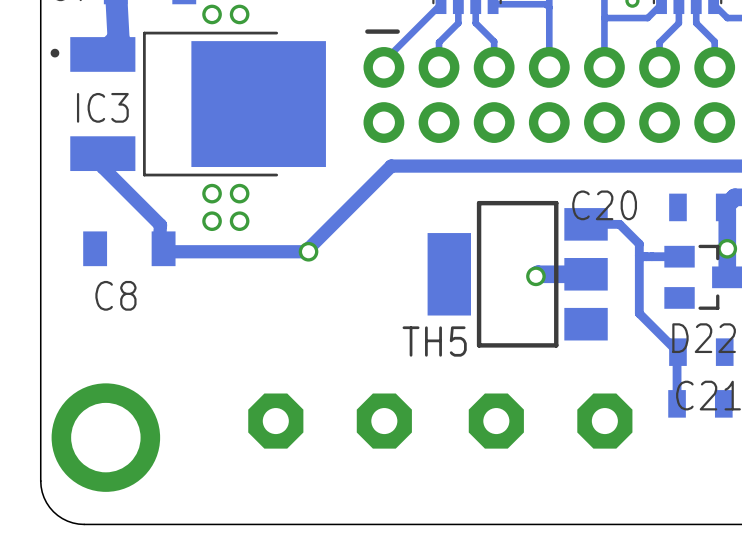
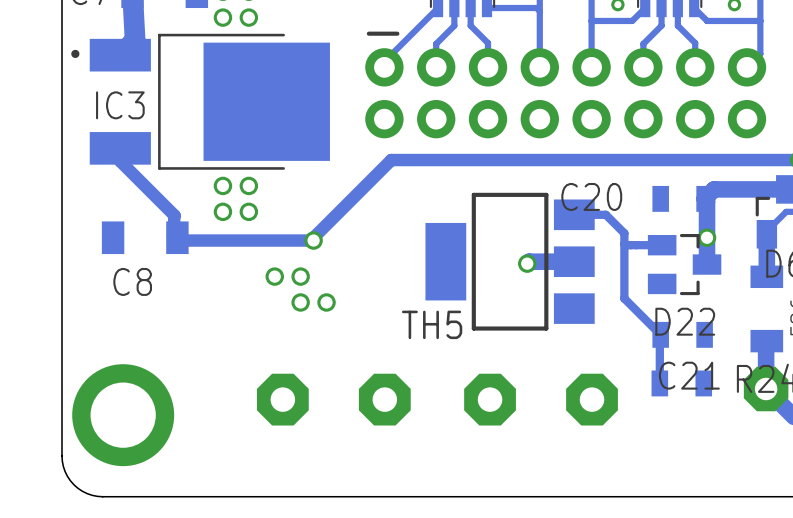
via: none -> (274, 276)
via: none -> (300, 276)
via: none -> (300, 302)
via: none -> (326, 302)

